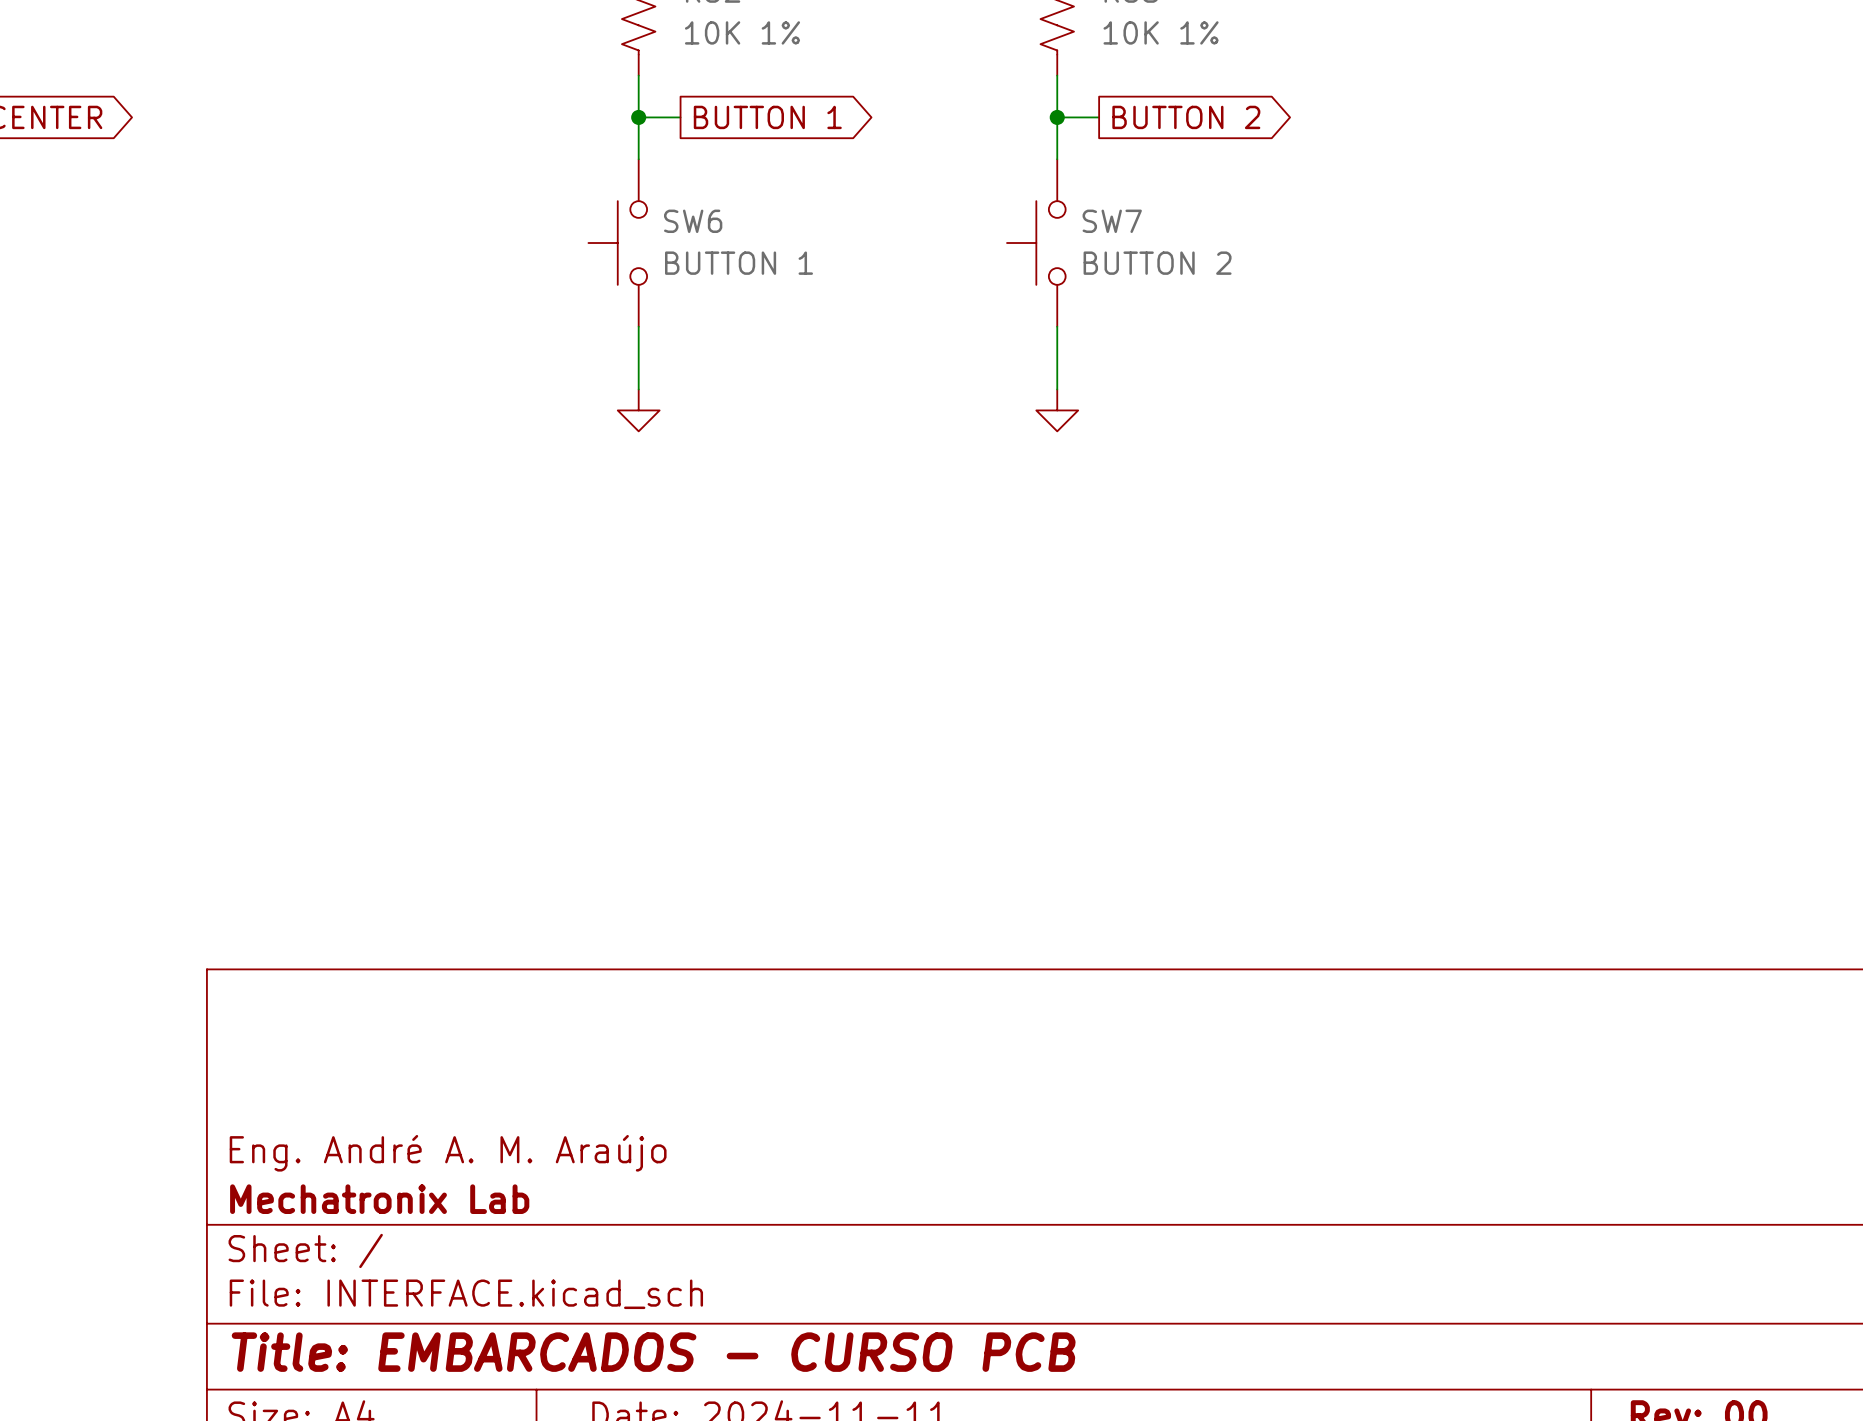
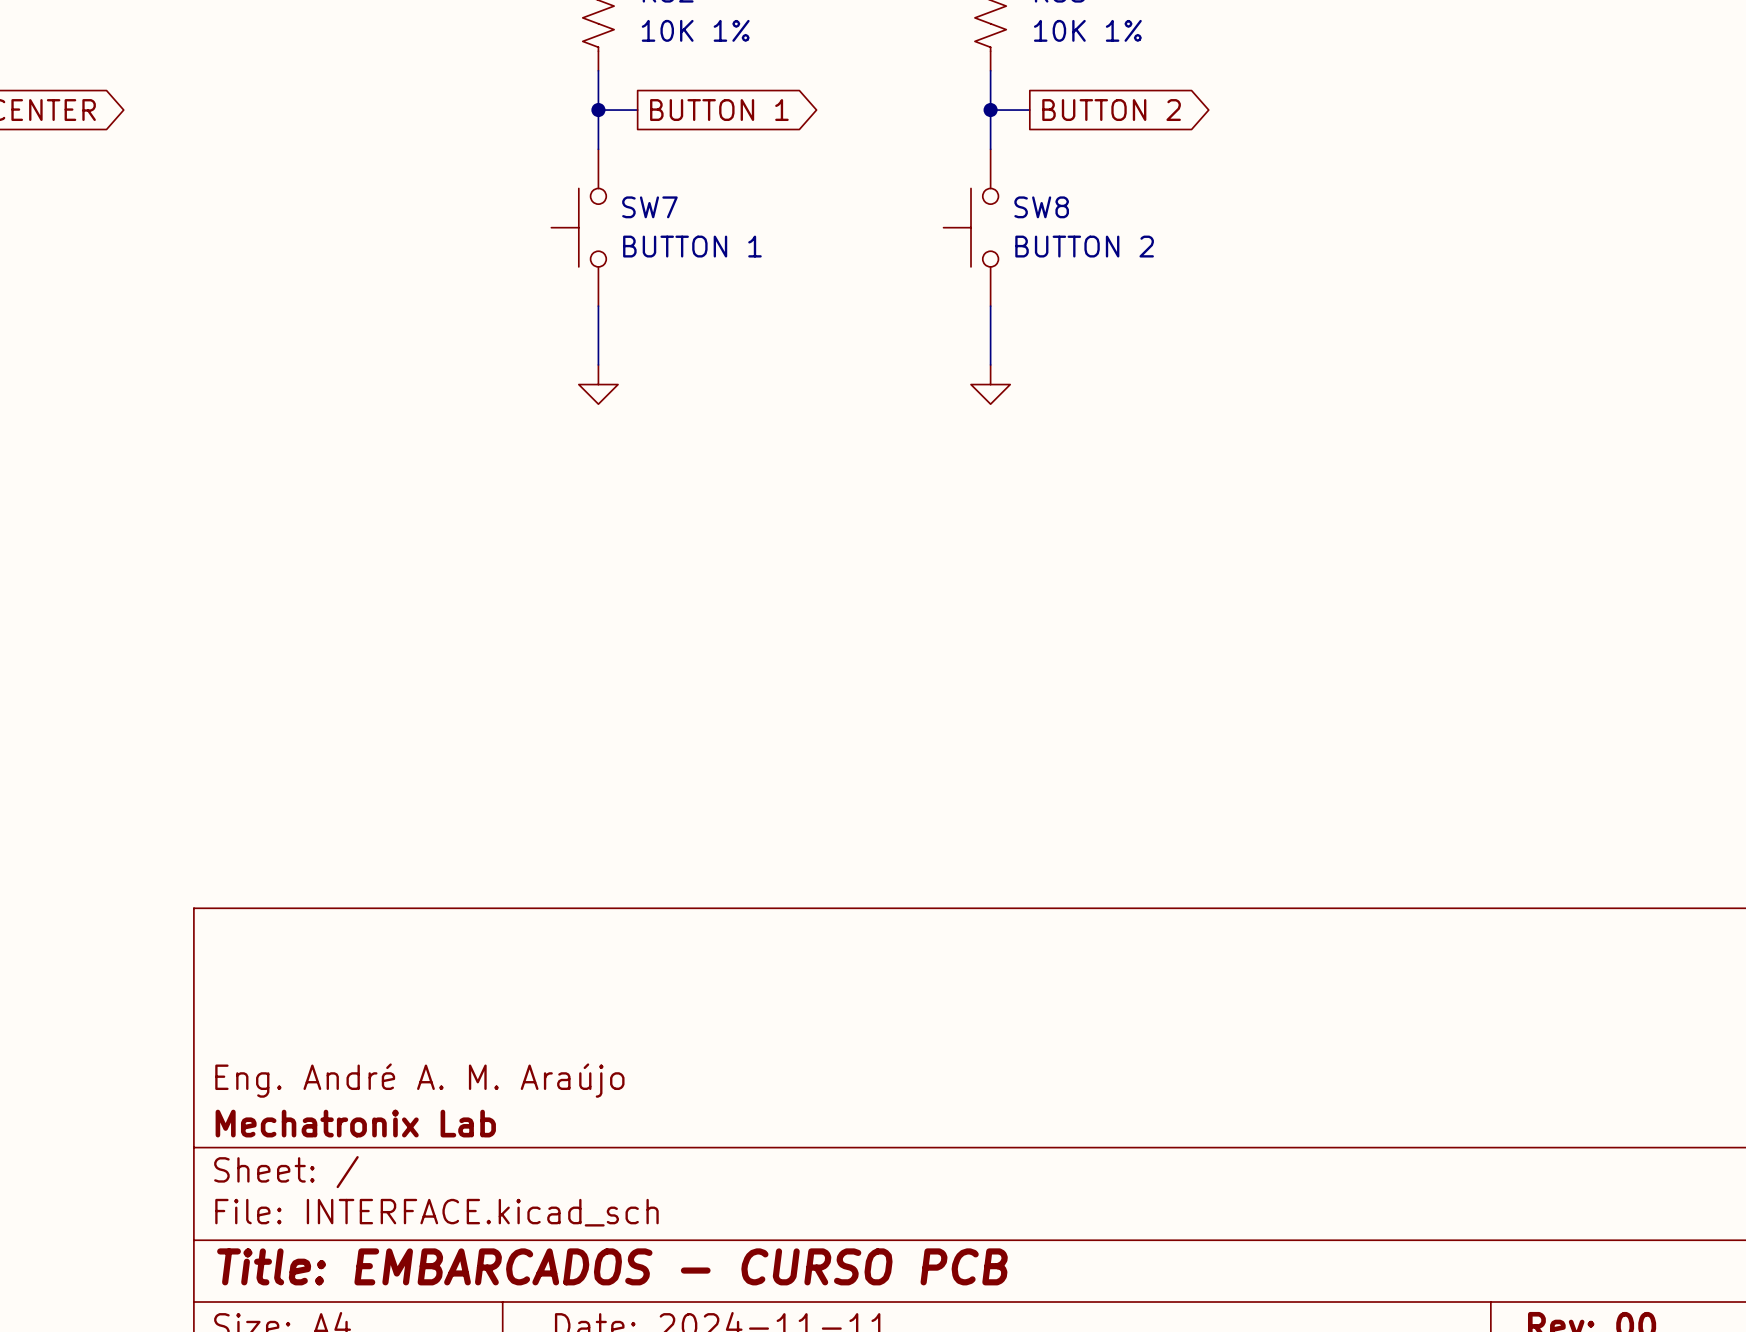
SW6 name: SW6 (693, 221) -> SW7 (649, 207)
SW7 name: SW7 (1112, 221) -> SW8 (1041, 207)

